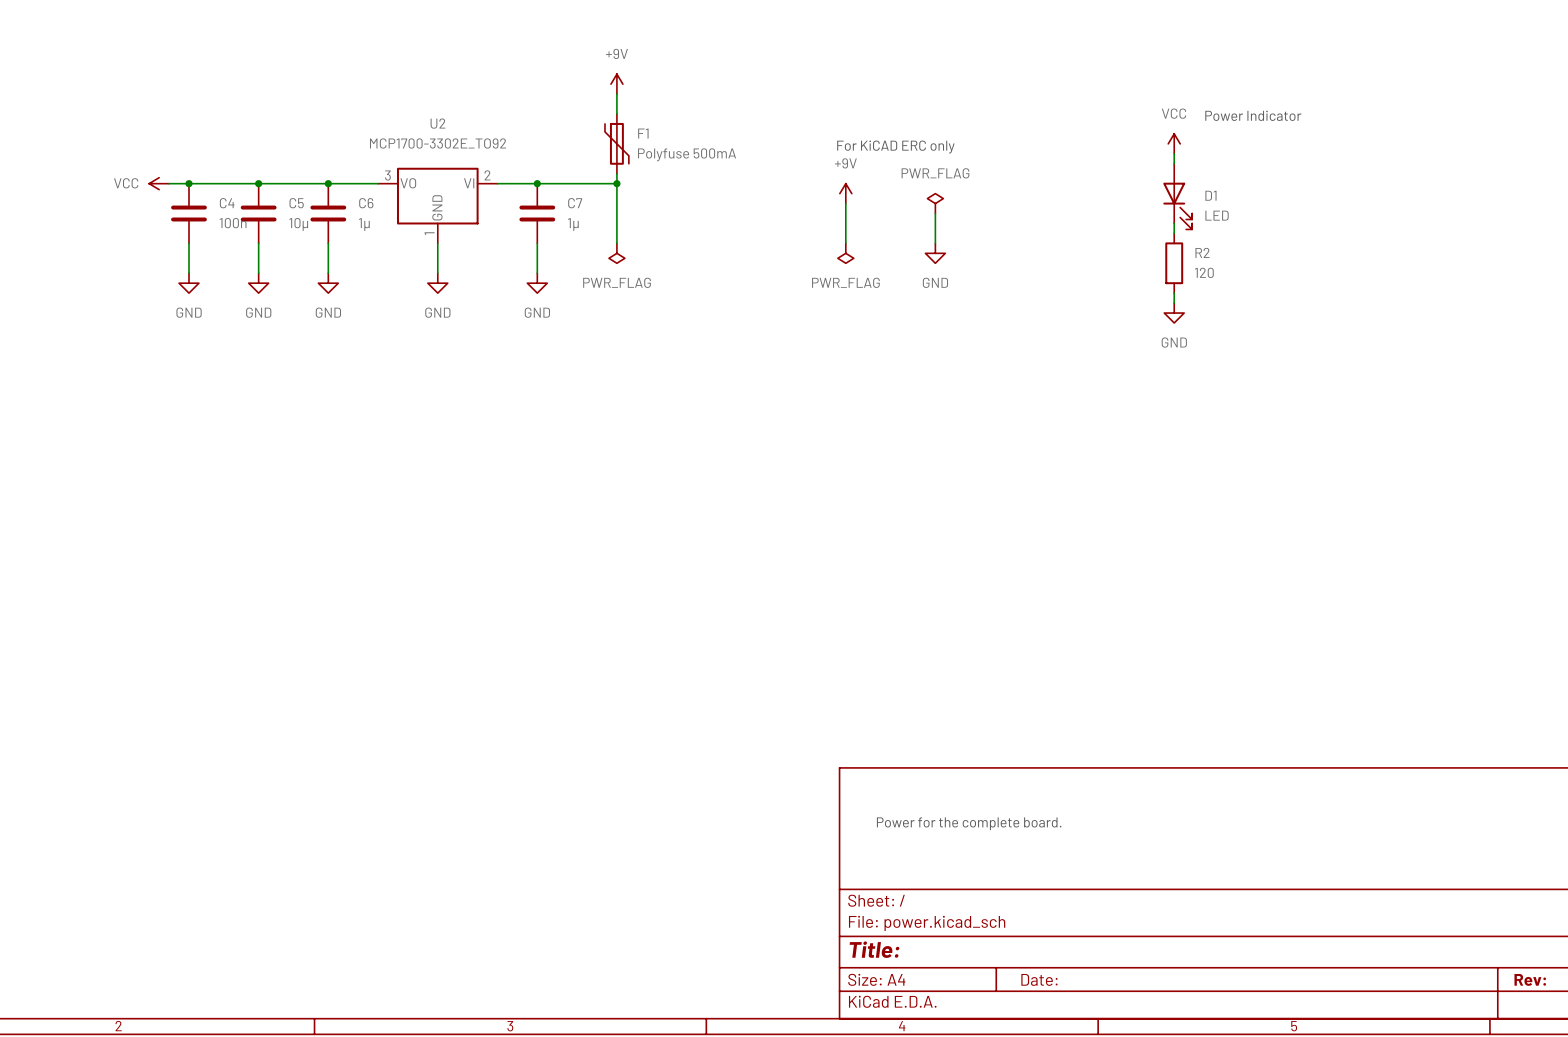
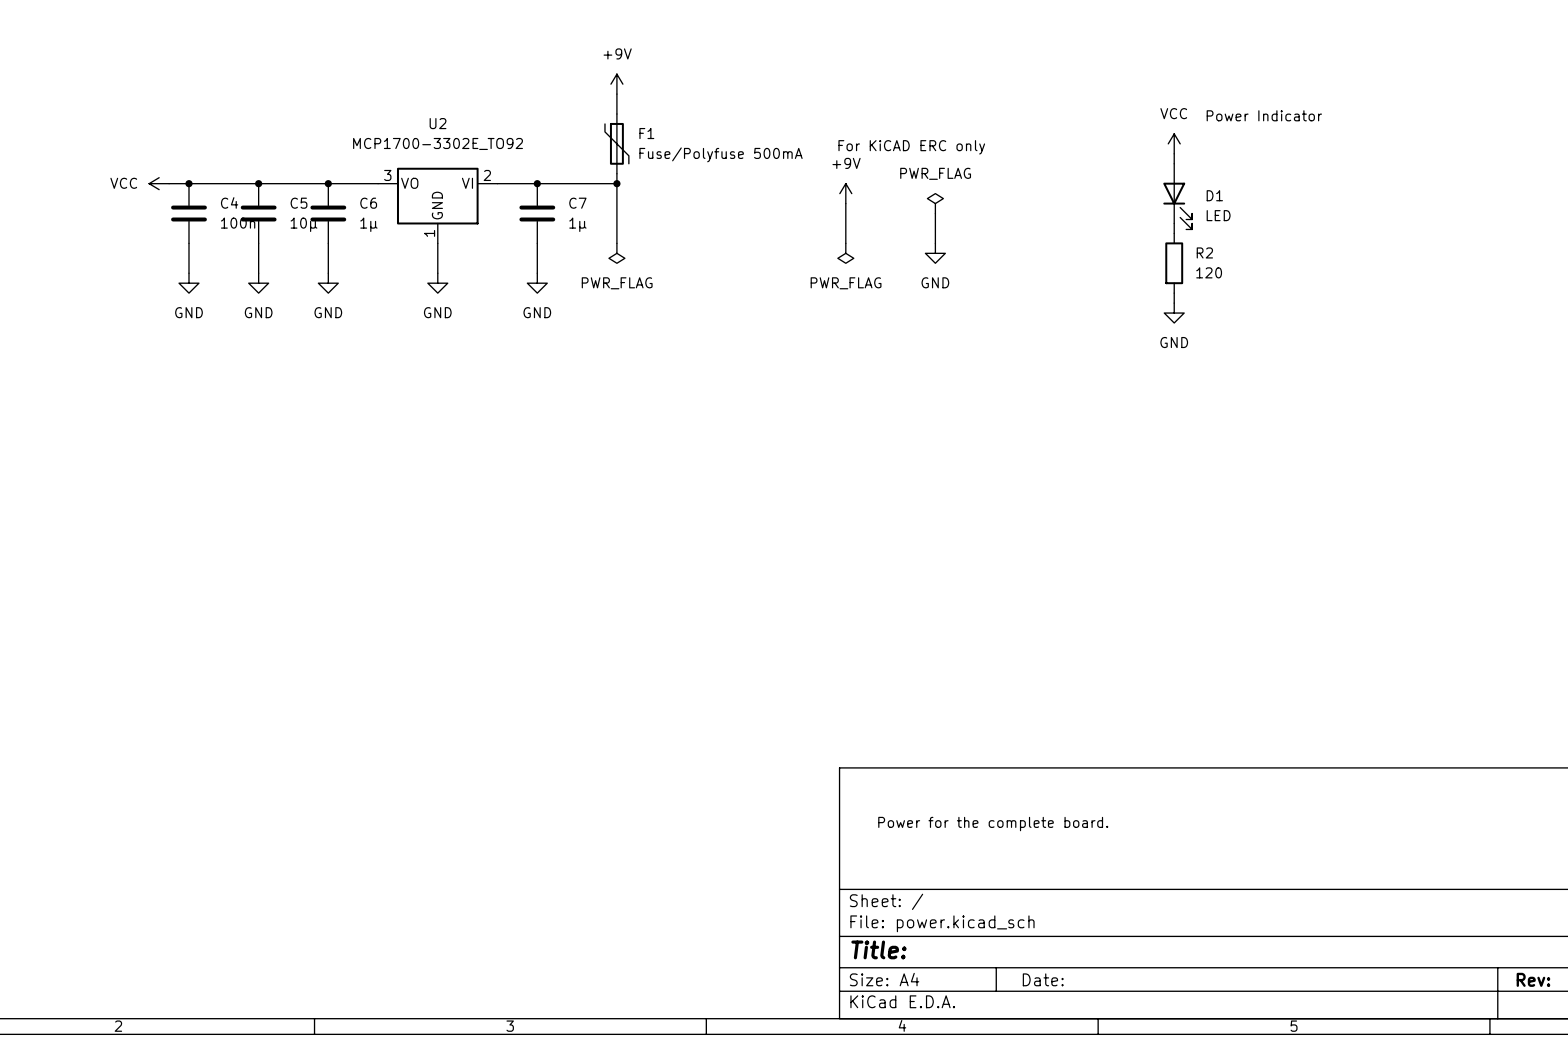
F1 value: Polyfuse 500mA (687, 154) -> Fuse/Polyfuse 500mA (721, 154)

